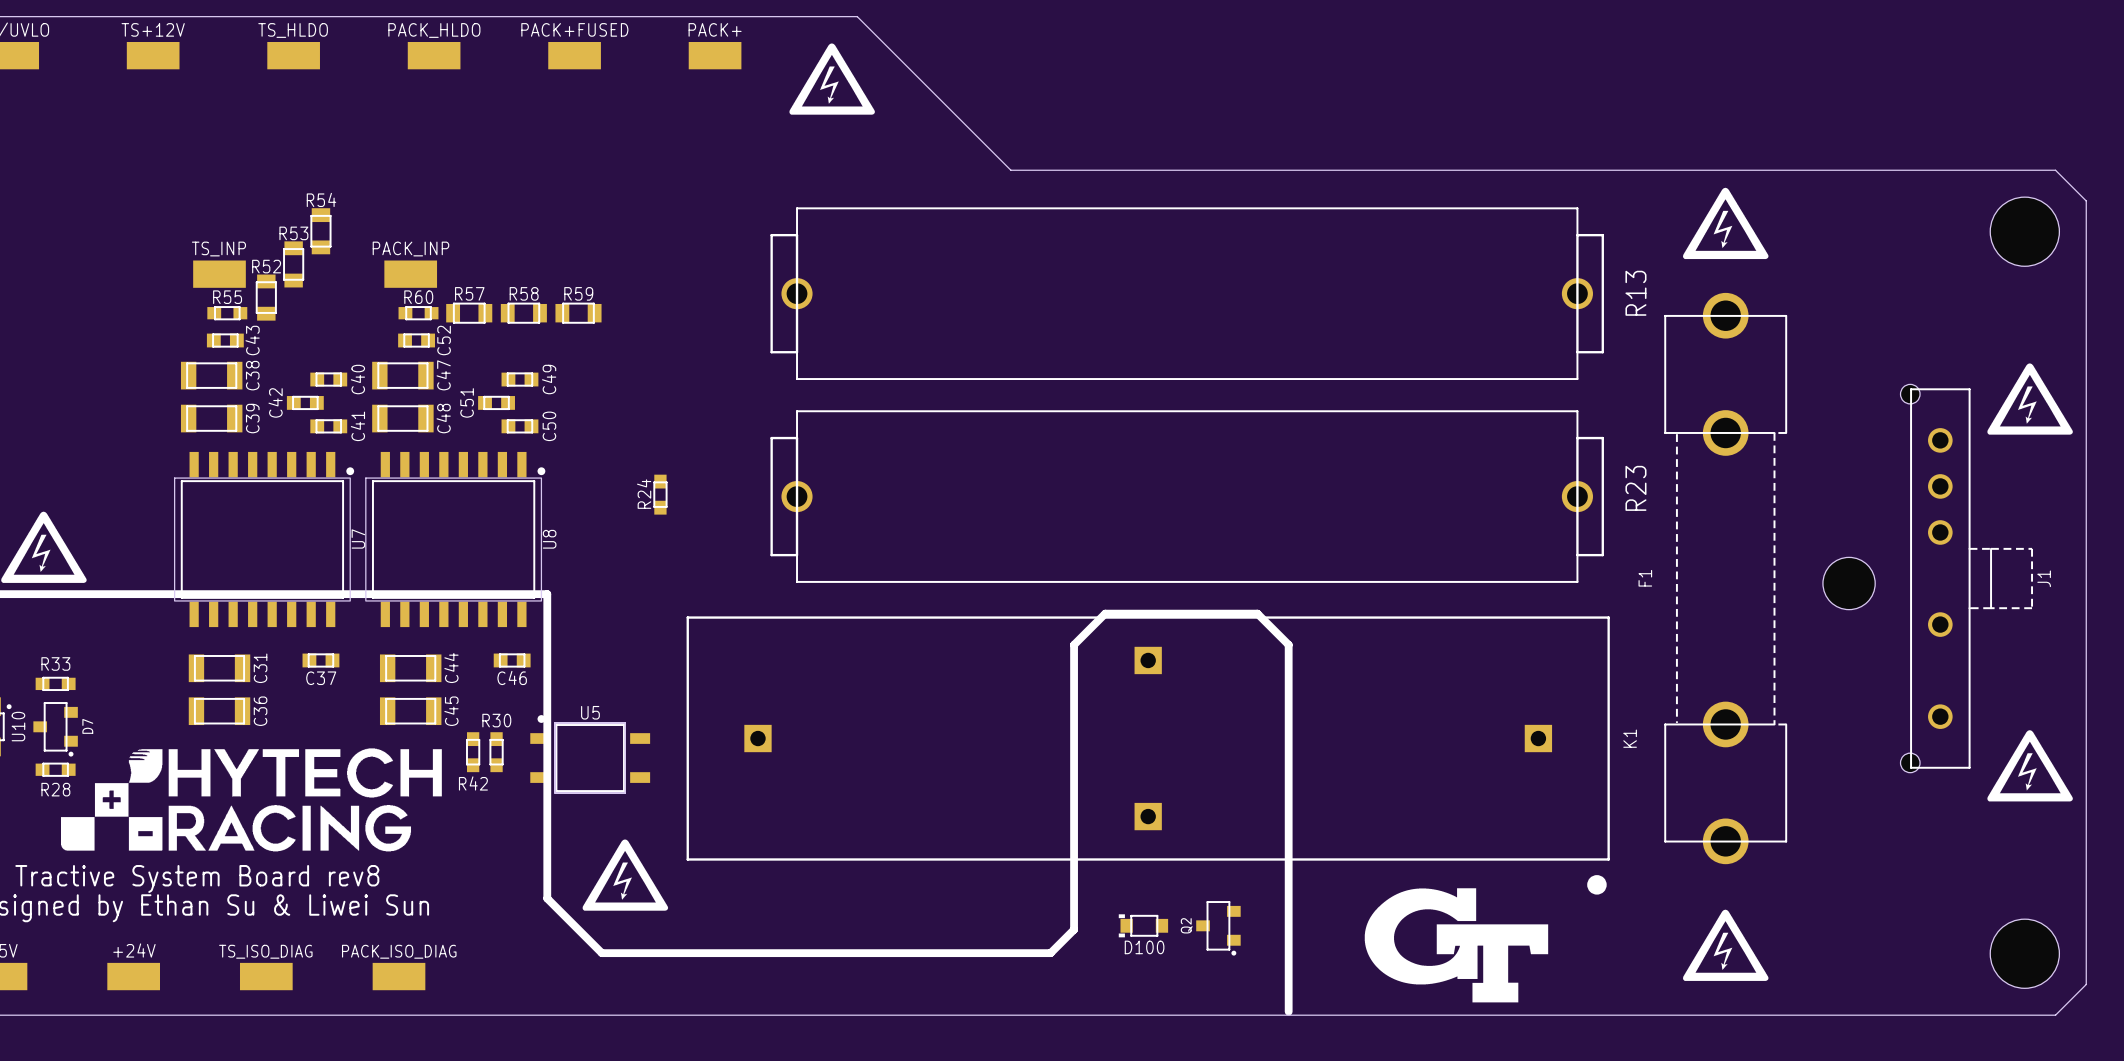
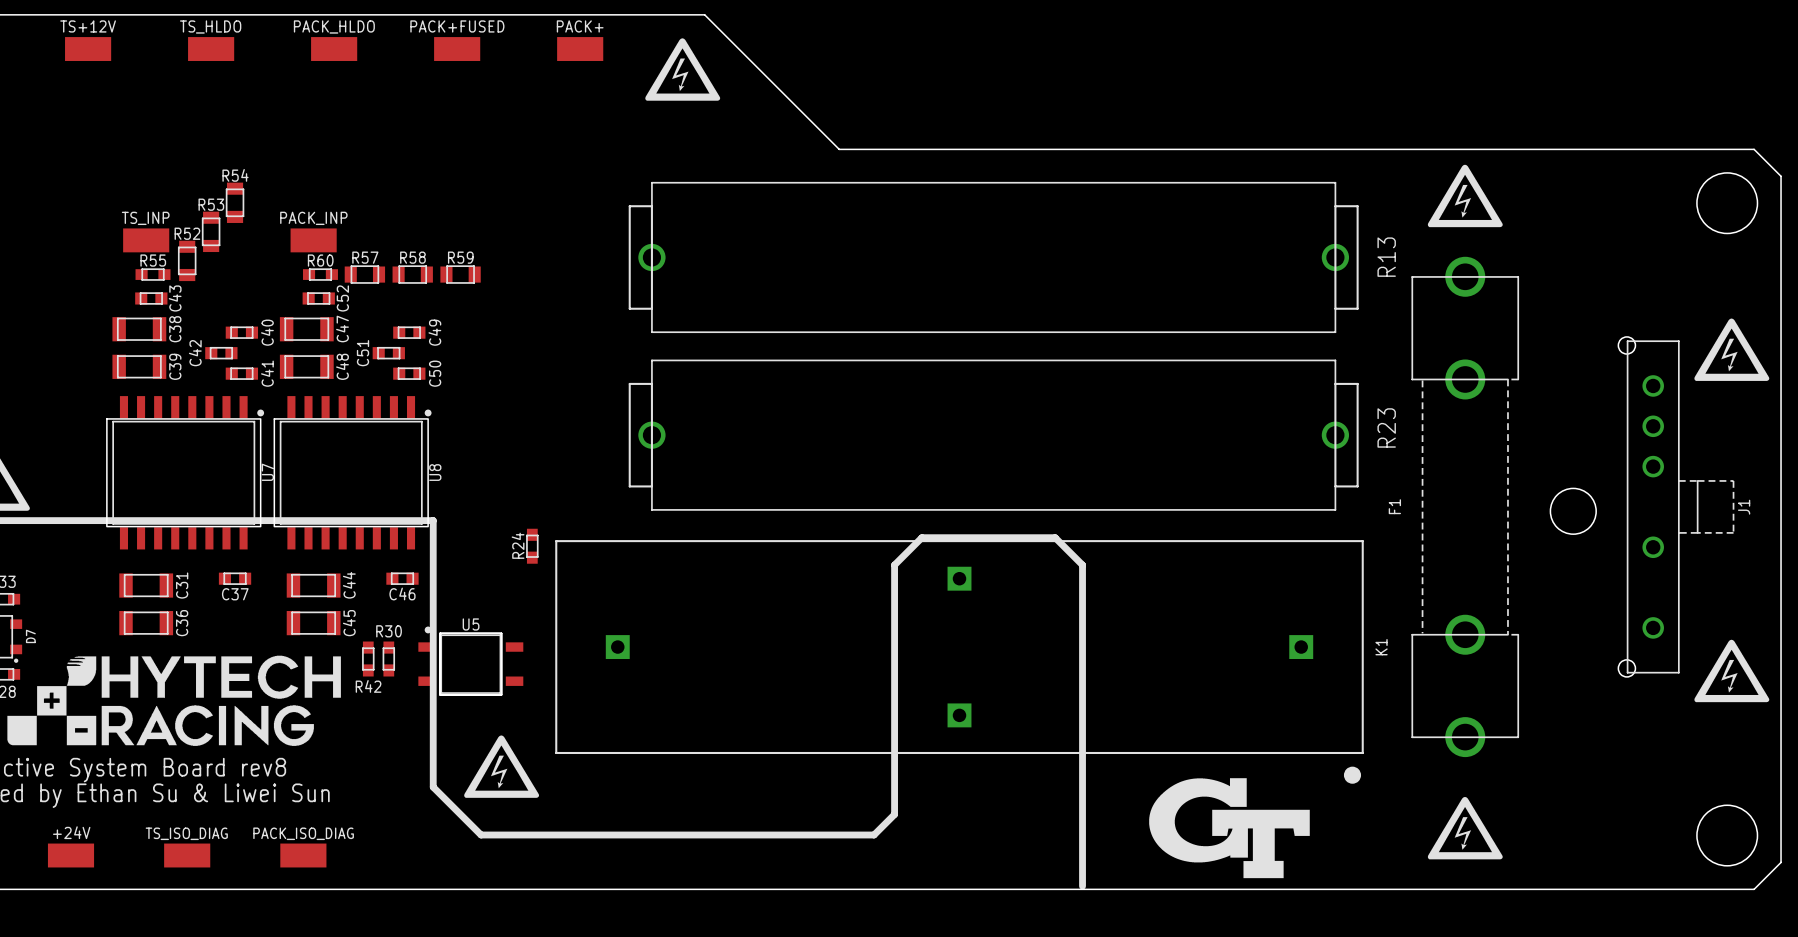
R24 position: (660, 494) -> (532, 546)
D100: (1143, 925) -> none
Q2: (1218, 928) -> none

